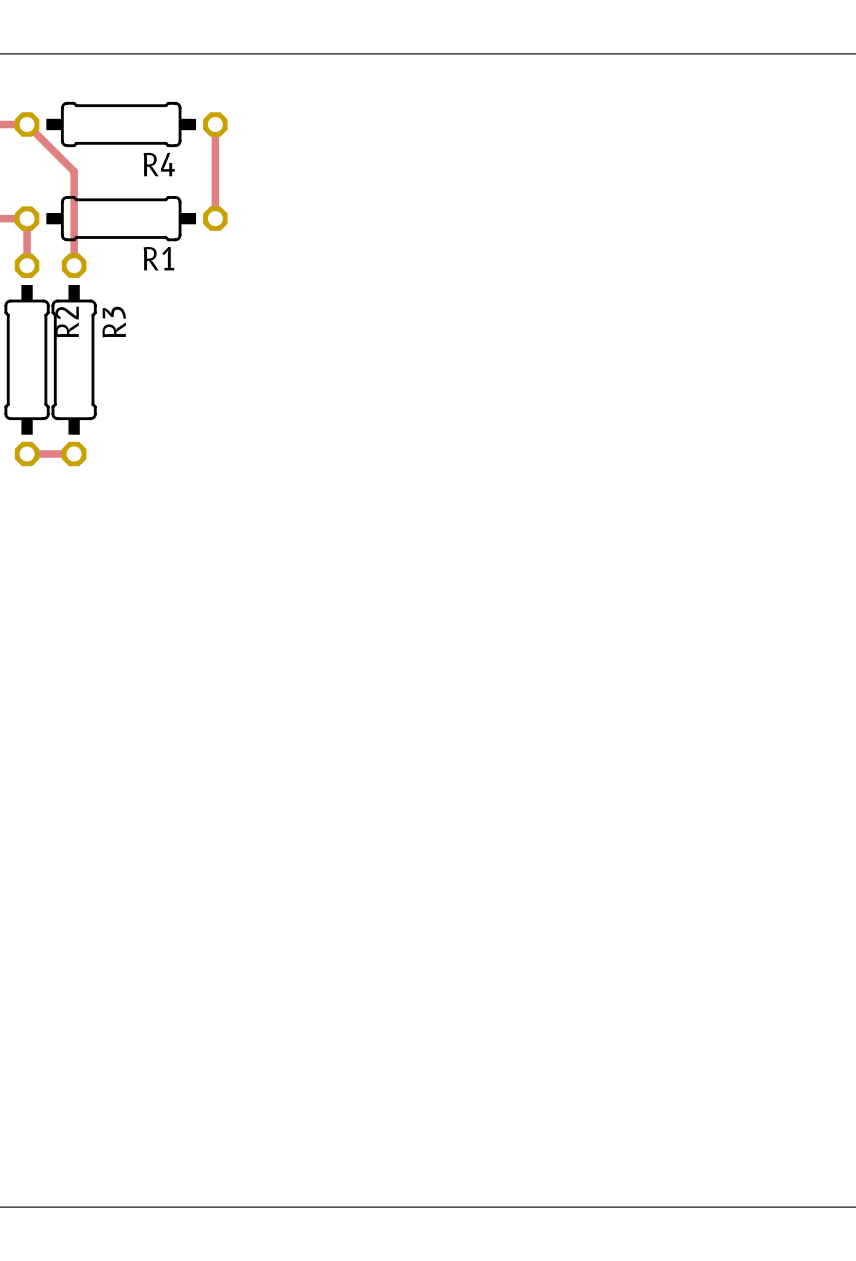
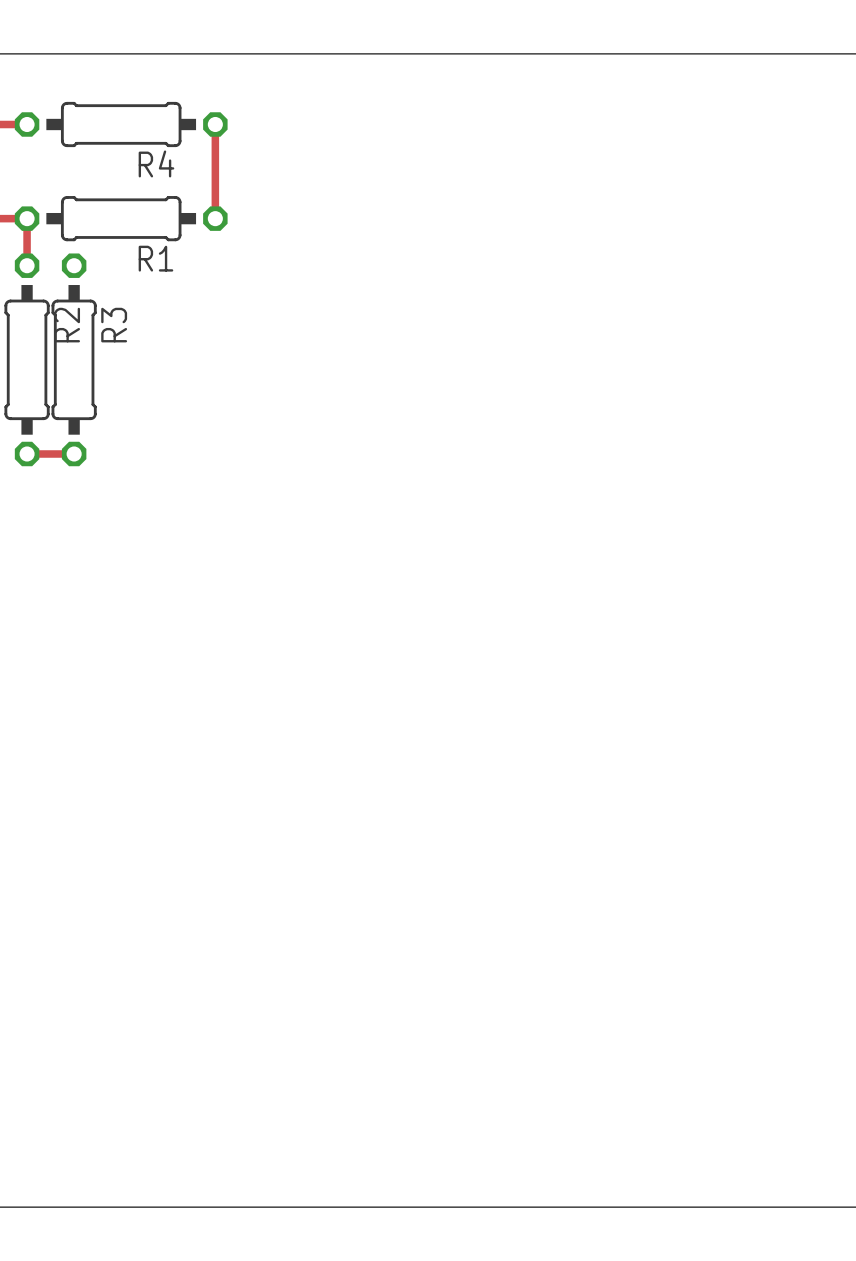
track: (27, 124) (74, 171) (74, 265) -> none

